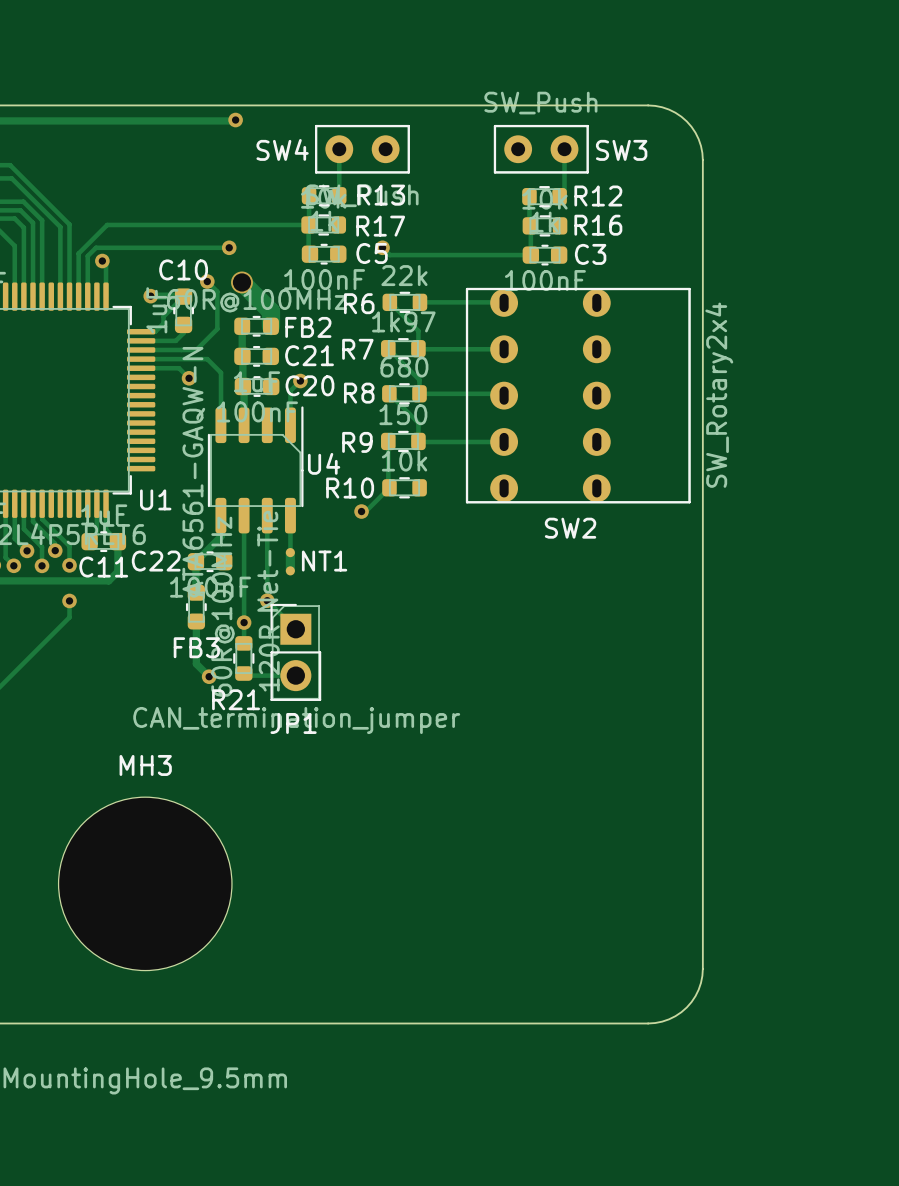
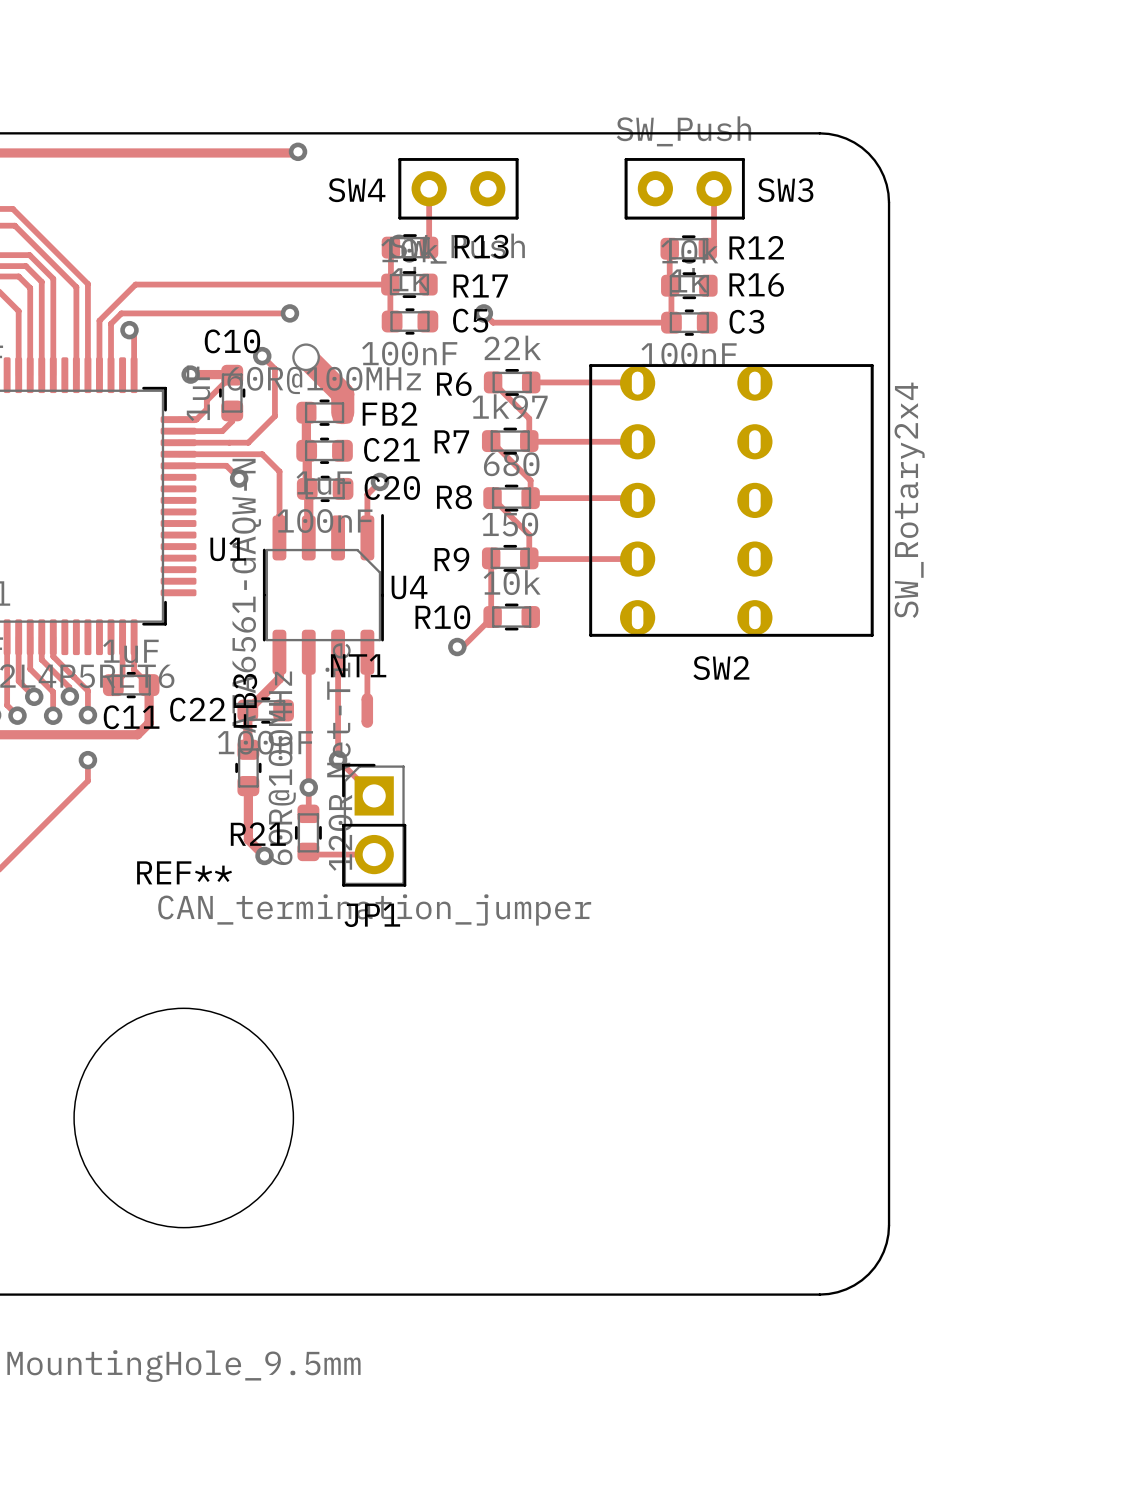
U1 name position: U1 (155, 499) -> U1 (228, 549)
NT1 name position: NT1 (324, 561) -> NT1 (358, 665)
FB3 name rotation: 0° (196, 647) -> 90° counterclockwise (245, 700)
FB3 name position: FB3 (196, 647) -> FB3 (245, 700)
R21 name position: R21 (236, 699) -> R21 (258, 834)
MH3 name: MH3 (145, 765) -> REF** (184, 872)

